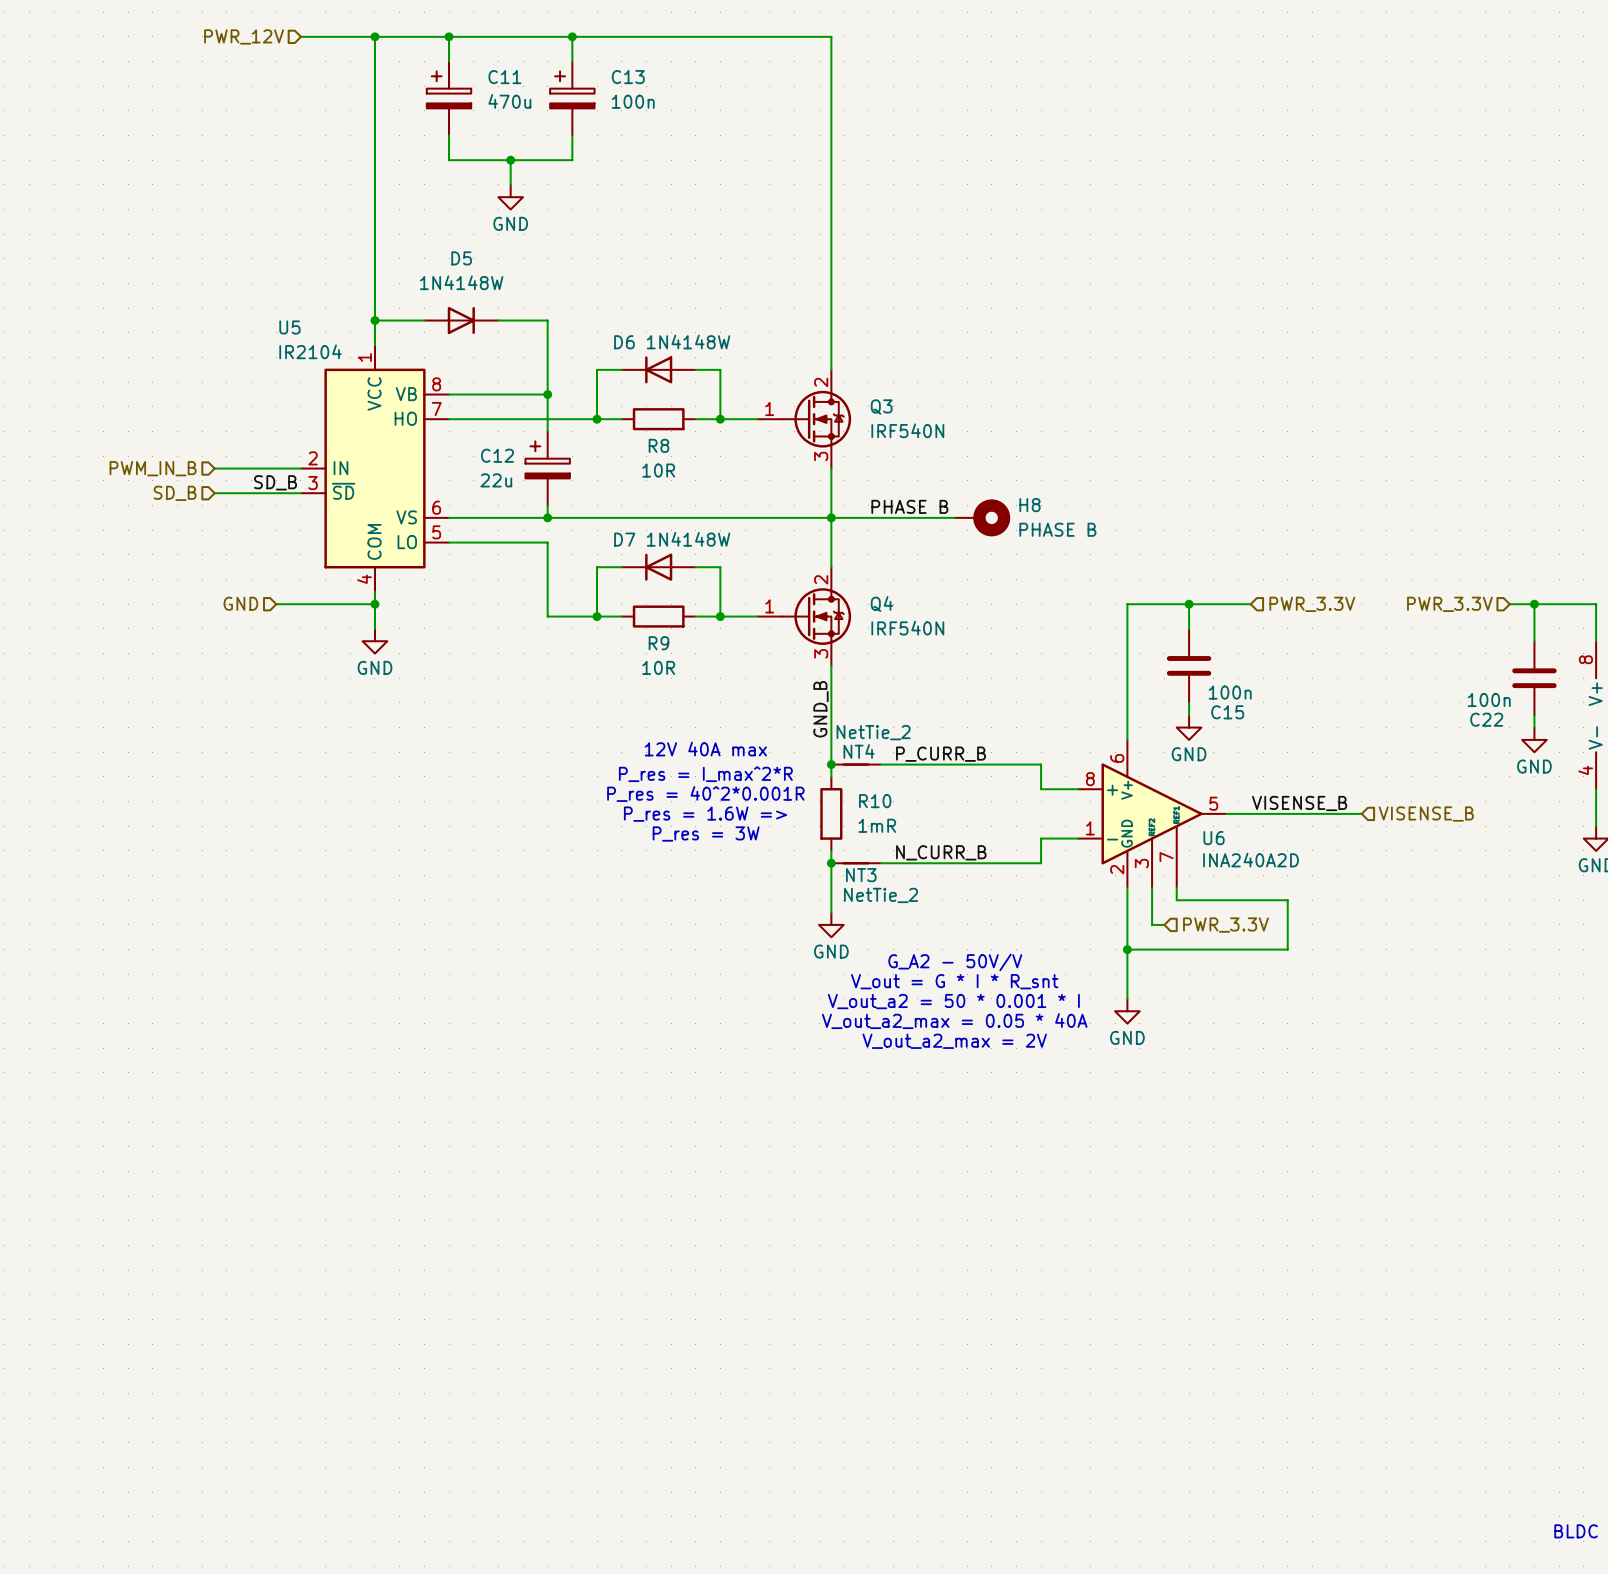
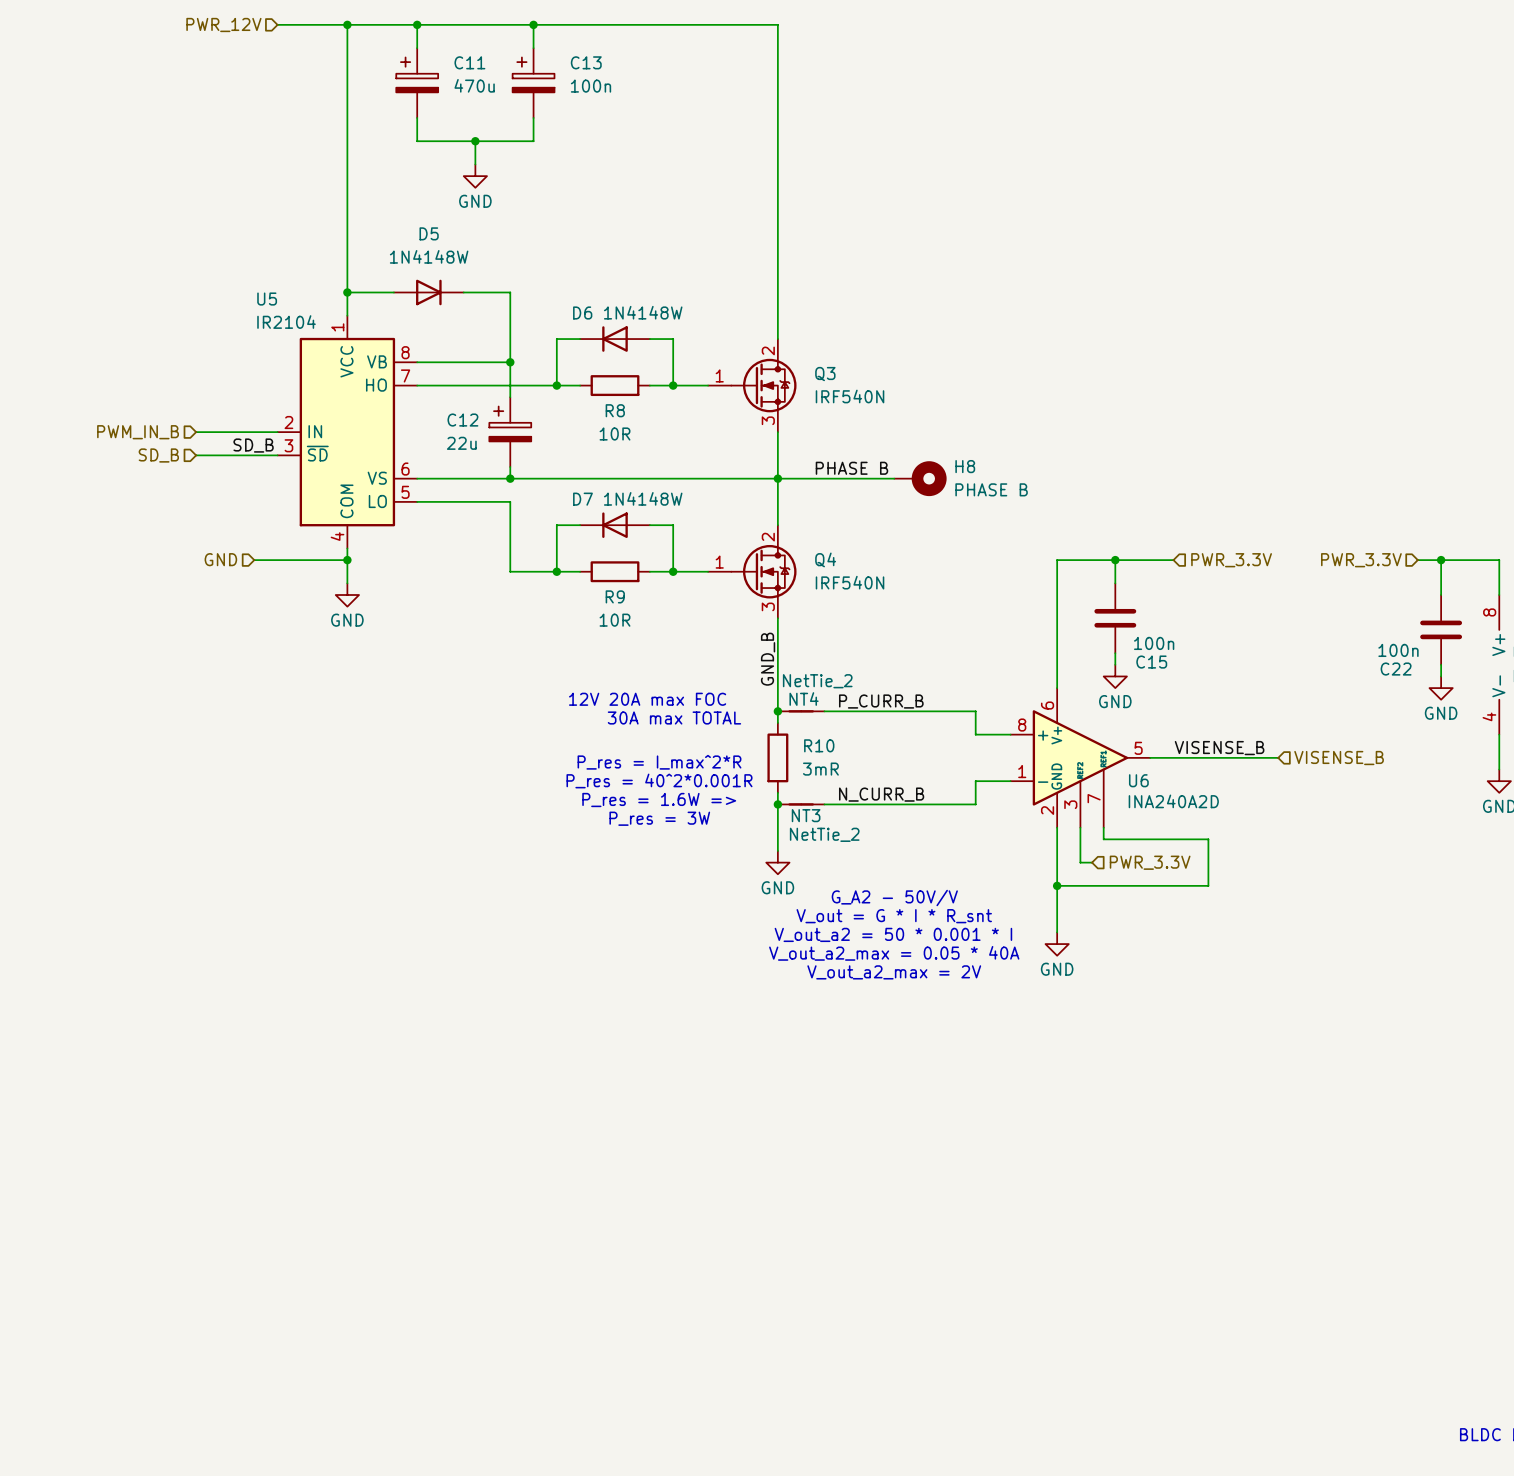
text: 12V 40A max (705, 749) -> 12V 20A max FOC (647, 699)
text: none -> 30A max TOTAL (674, 718)
text: P_res = I_max^2*R (705, 774) -> none
text: P_res = 40^2*0.001R (705, 793) -> none
text: P_res = 1.6W => (705, 814) -> P_res = I_max^2*R (659, 762)
R10 value: 1mR (877, 825) -> 3mR (820, 769)
text: P_res = 3W (706, 833) -> P_res = 40^2*0.001R (659, 780)
text: none -> P_res = 1.6W => (659, 800)
text: none -> P_res = 3W (659, 818)

